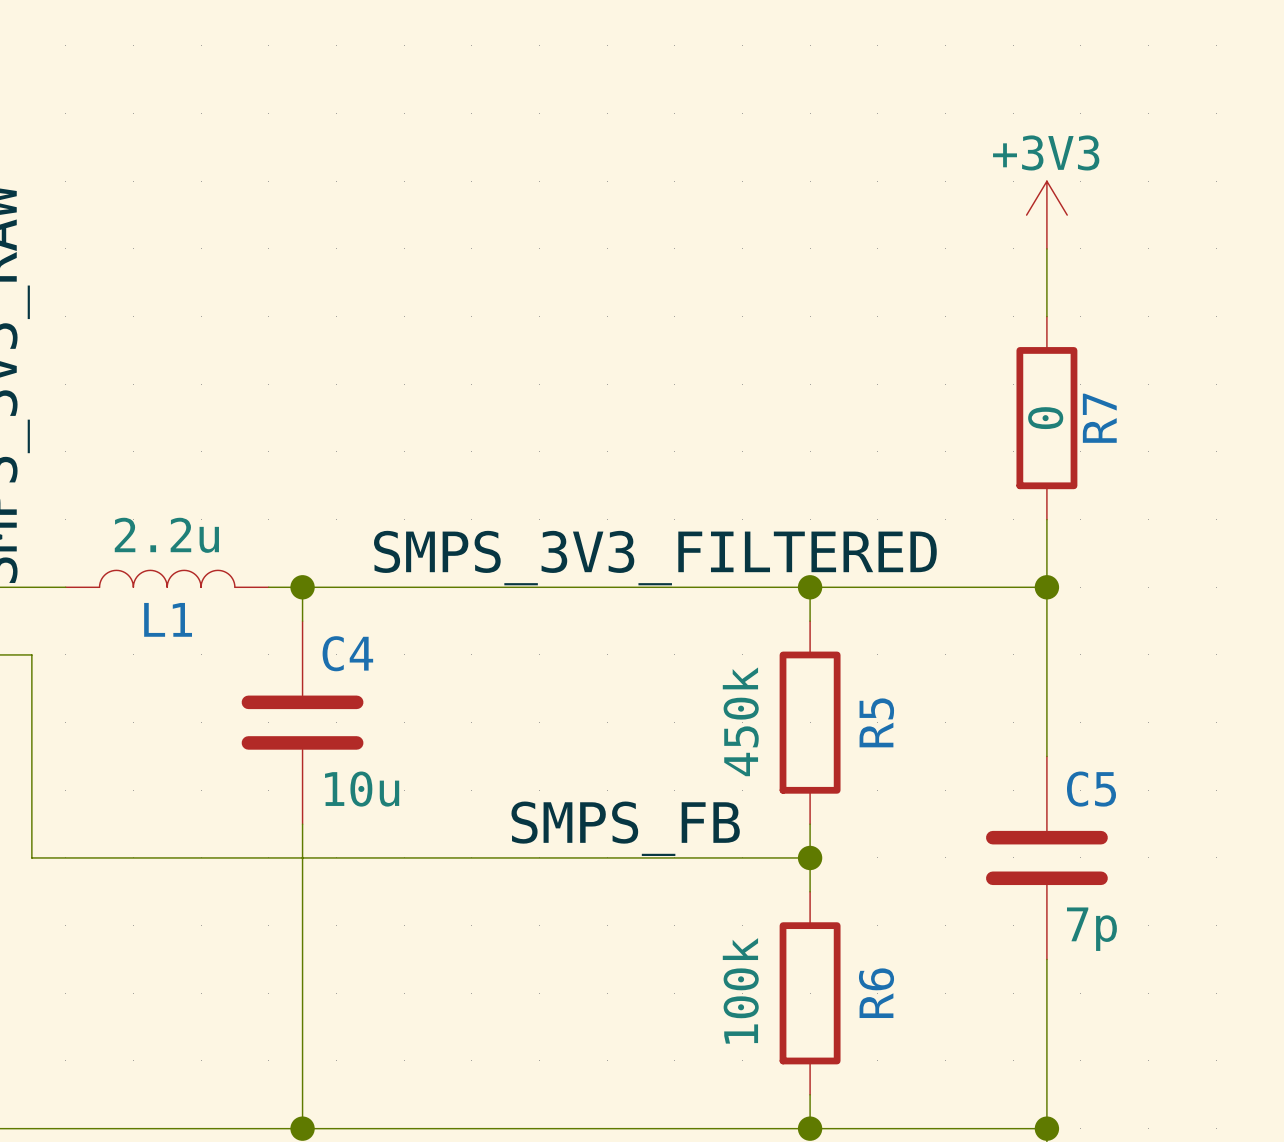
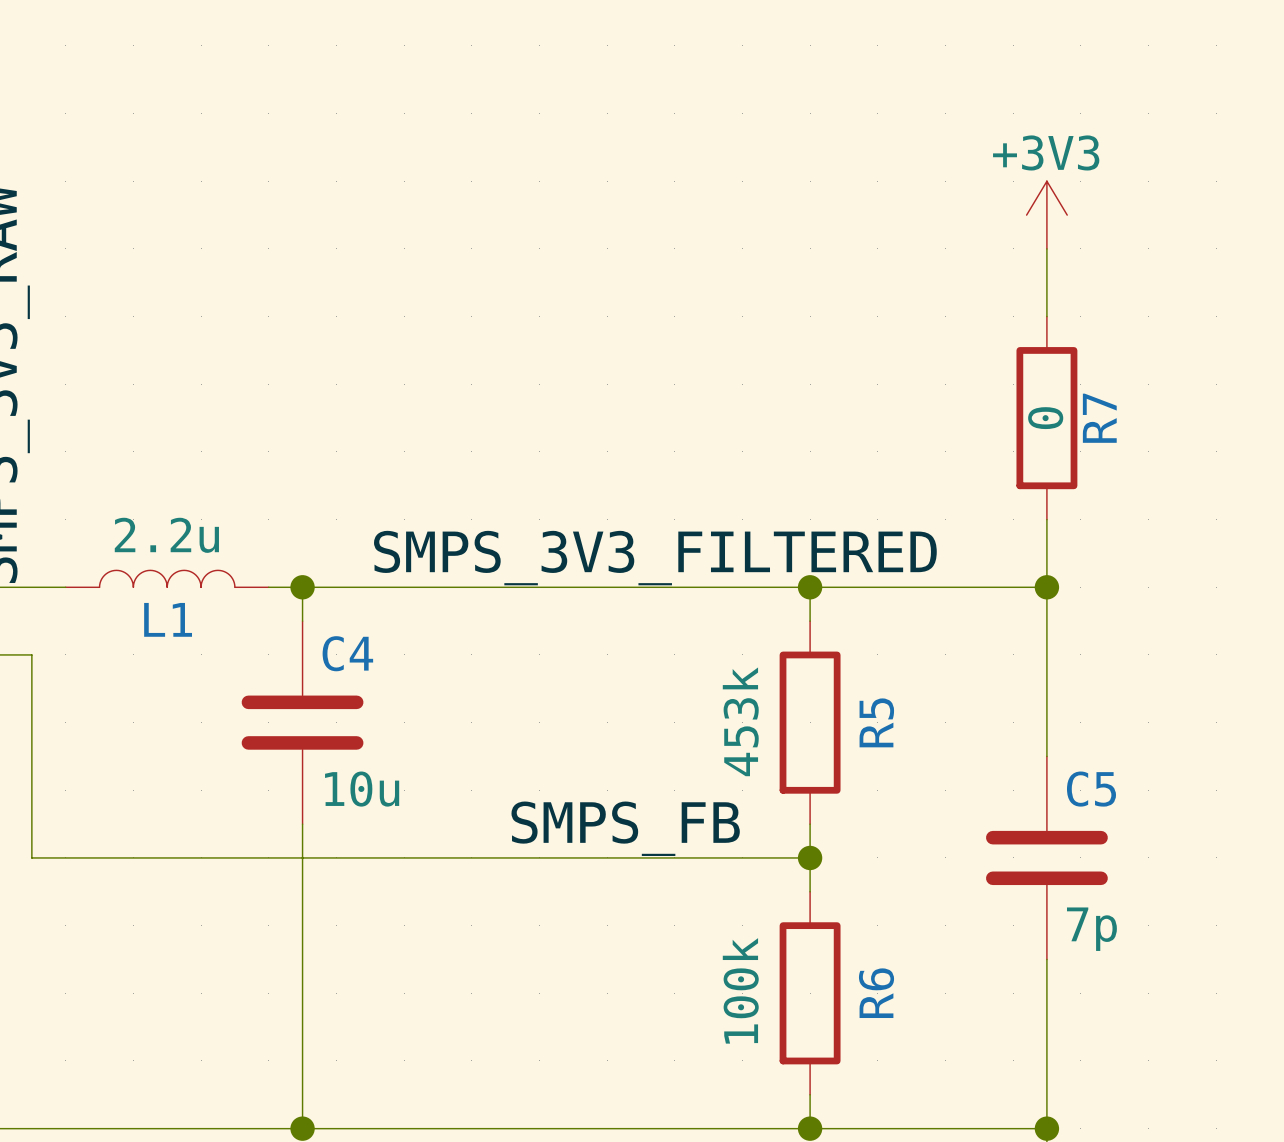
R5 value: 450k (740, 721) -> 453k (740, 721)

